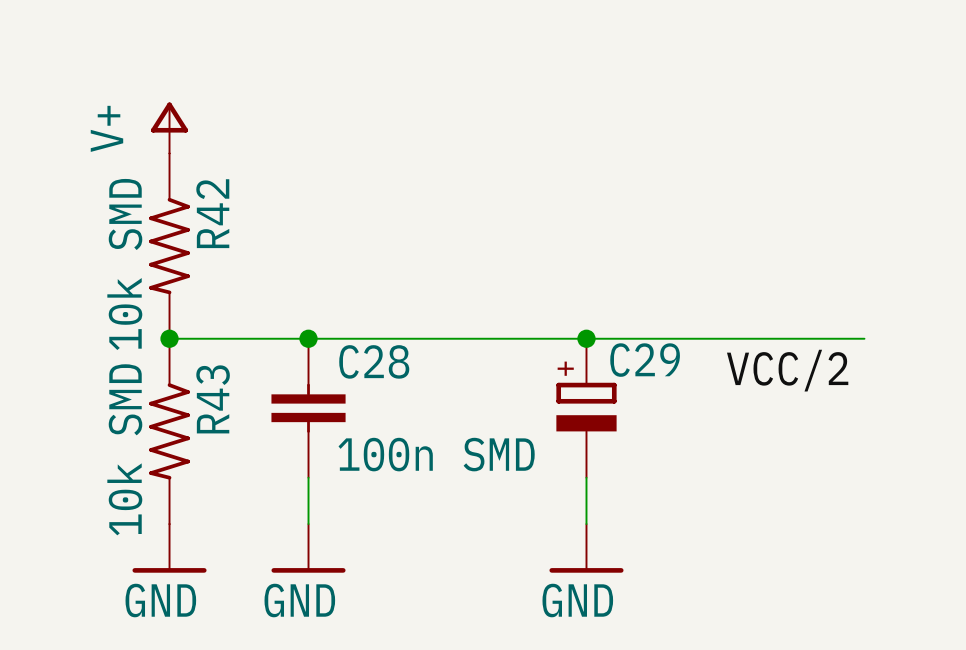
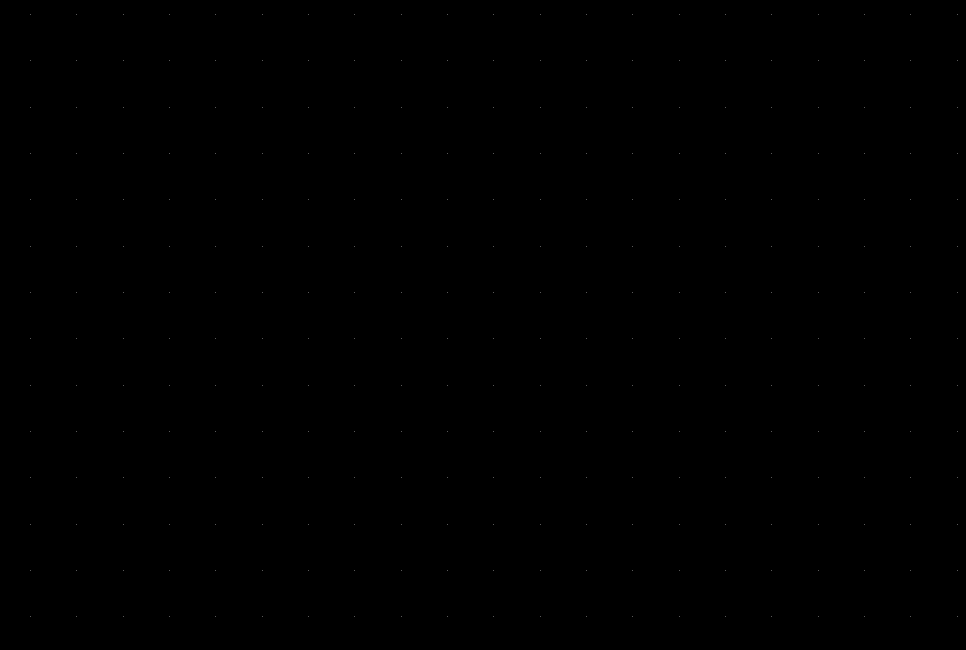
power symbol: V+ (169, 127) -> none
R42: 10k SMD (169, 246) -> none
wire: (169, 338) (864, 338) -> none
junction: (169, 338) -> none
junction: (308, 338) -> none
junction: (586, 338) -> none
label: VCC/2 (787, 370) -> none
C28: 100n SMD (308, 408) -> none
C29: (586, 408) -> none
R43: 10k SMD (169, 431) -> none
wire: (308, 477) (308, 524) -> none
wire: (586, 477) (586, 524) -> none
power symbol: GND (169, 548) -> none
power symbol: GND (308, 548) -> none
power symbol: GND (586, 548) -> none

